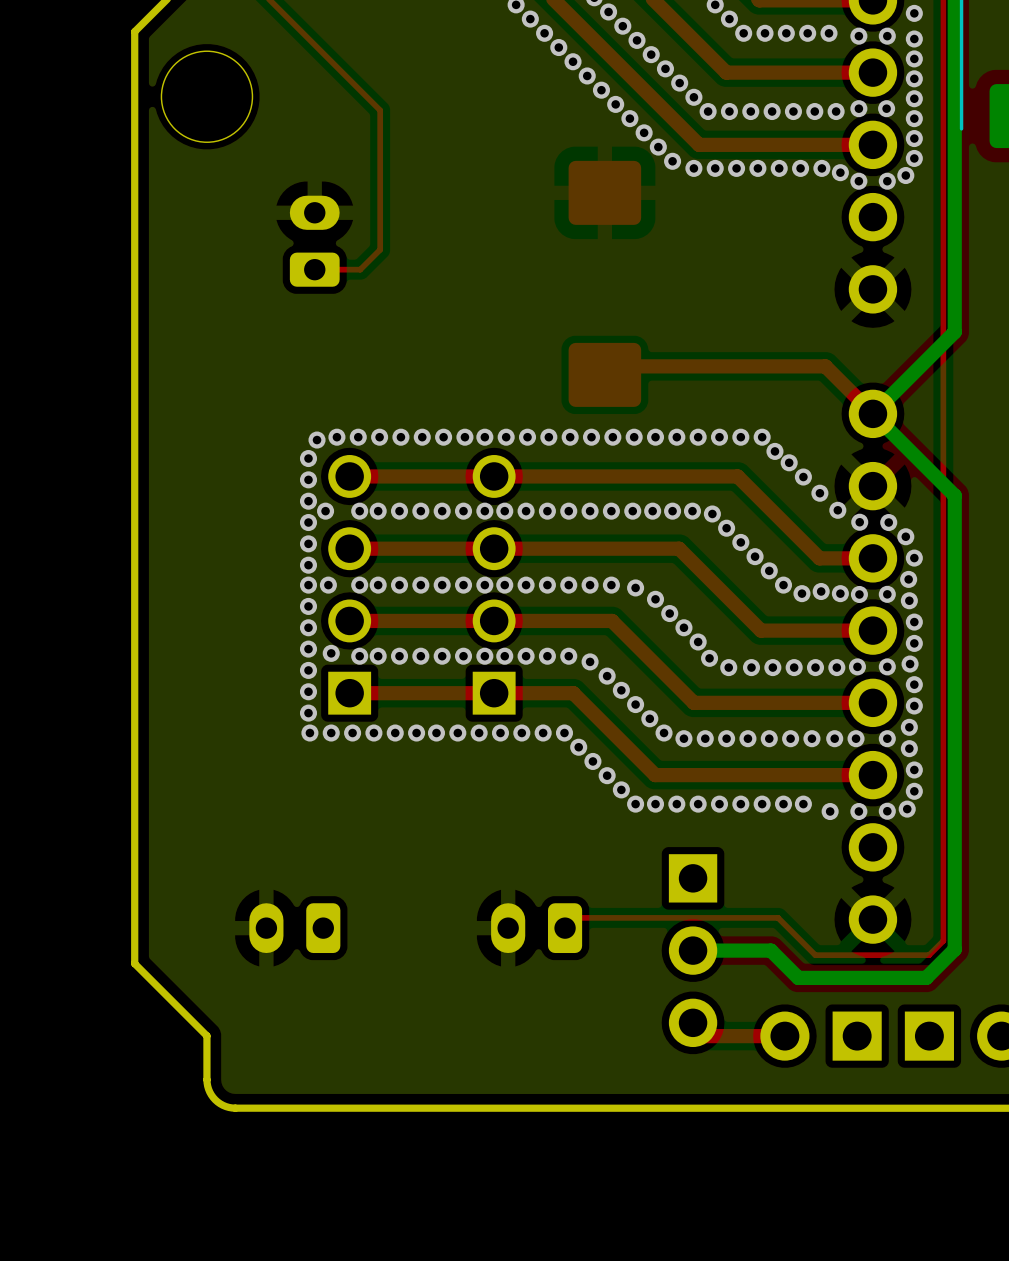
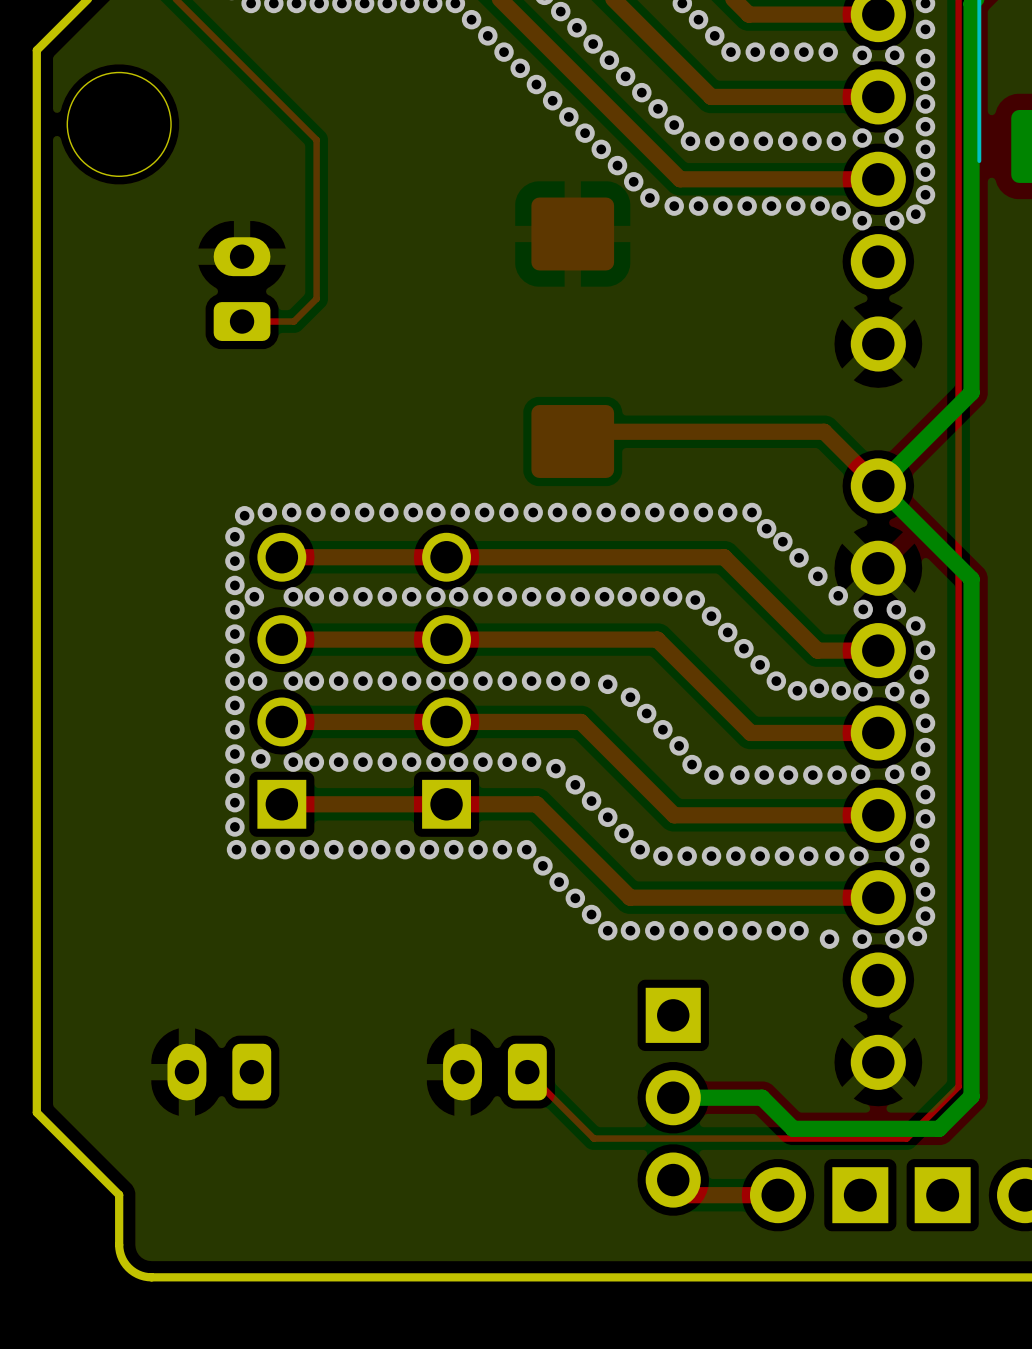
top track: (565, 928) (575, 917) (778, 917) (815, 955) (929, 955) -> (527, 1072) (593, 1138) (906, 1138) (942, 1102)

